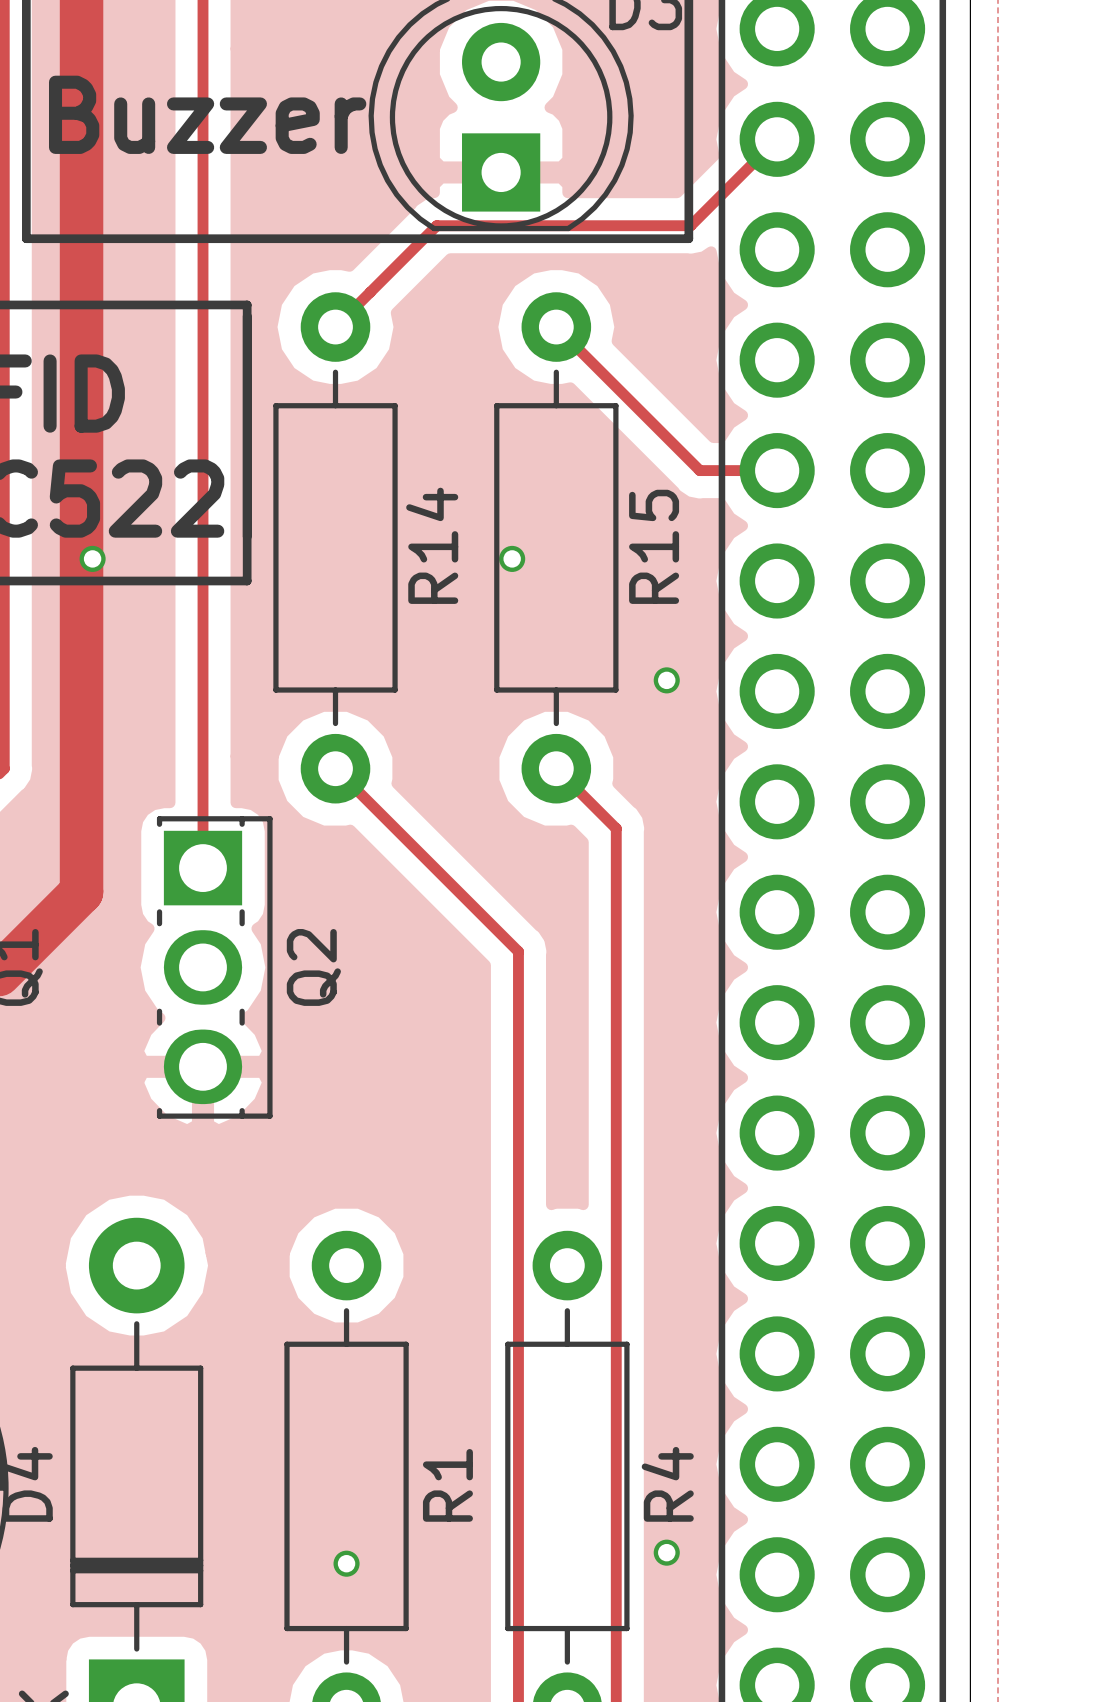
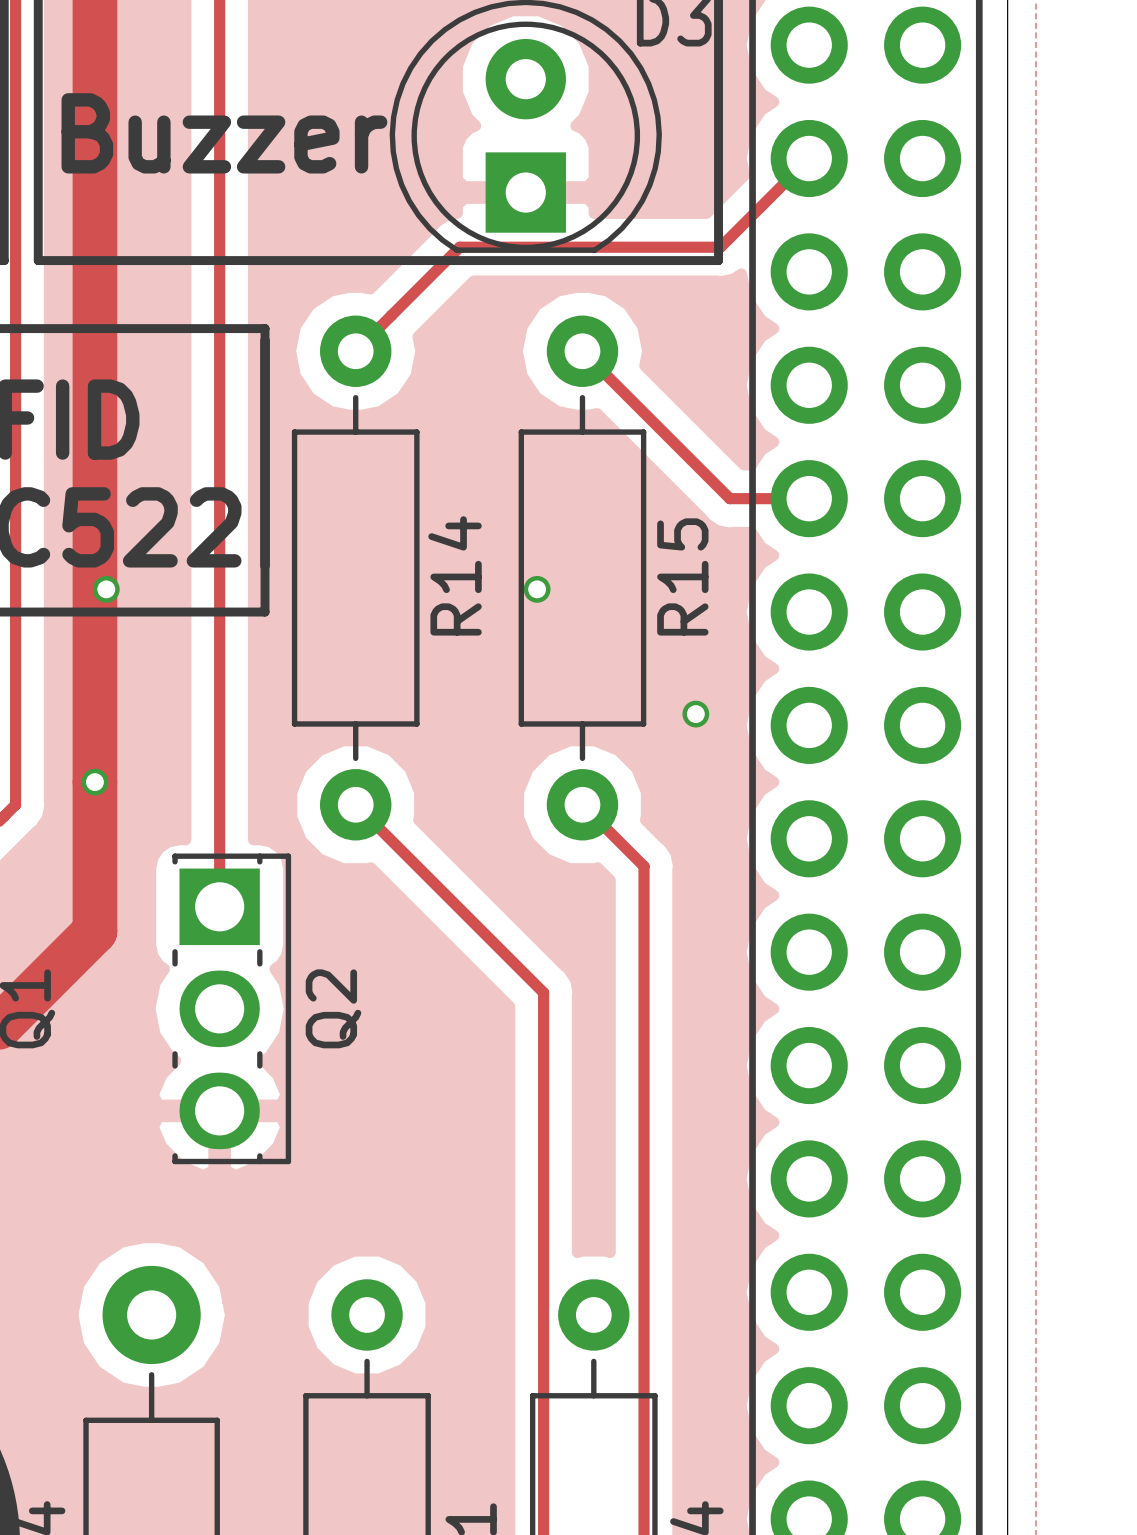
via: none -> (94, 782)

